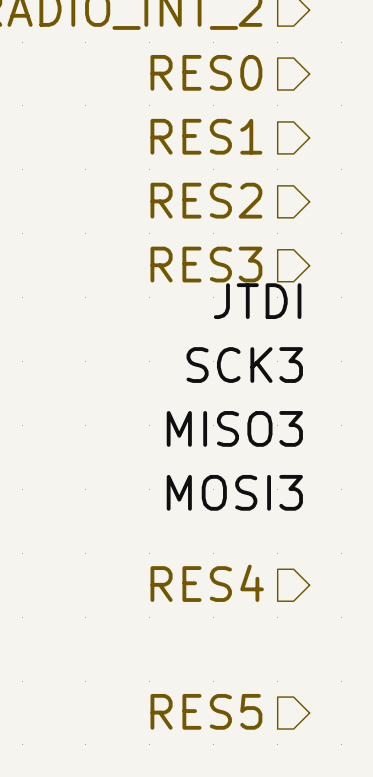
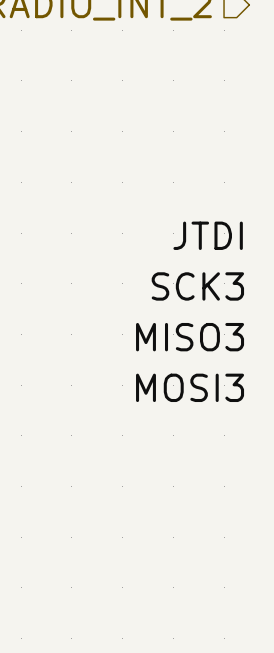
hierarchical label: RES0 (206, 72) -> none
hierarchical label: RES1 (206, 136) -> none
hierarchical label: RES2 (206, 200) -> none
hierarchical label: RES3 (206, 264) -> none
hierarchical label: RES4 (207, 583) -> none
hierarchical label: RES5 (206, 711) -> none

